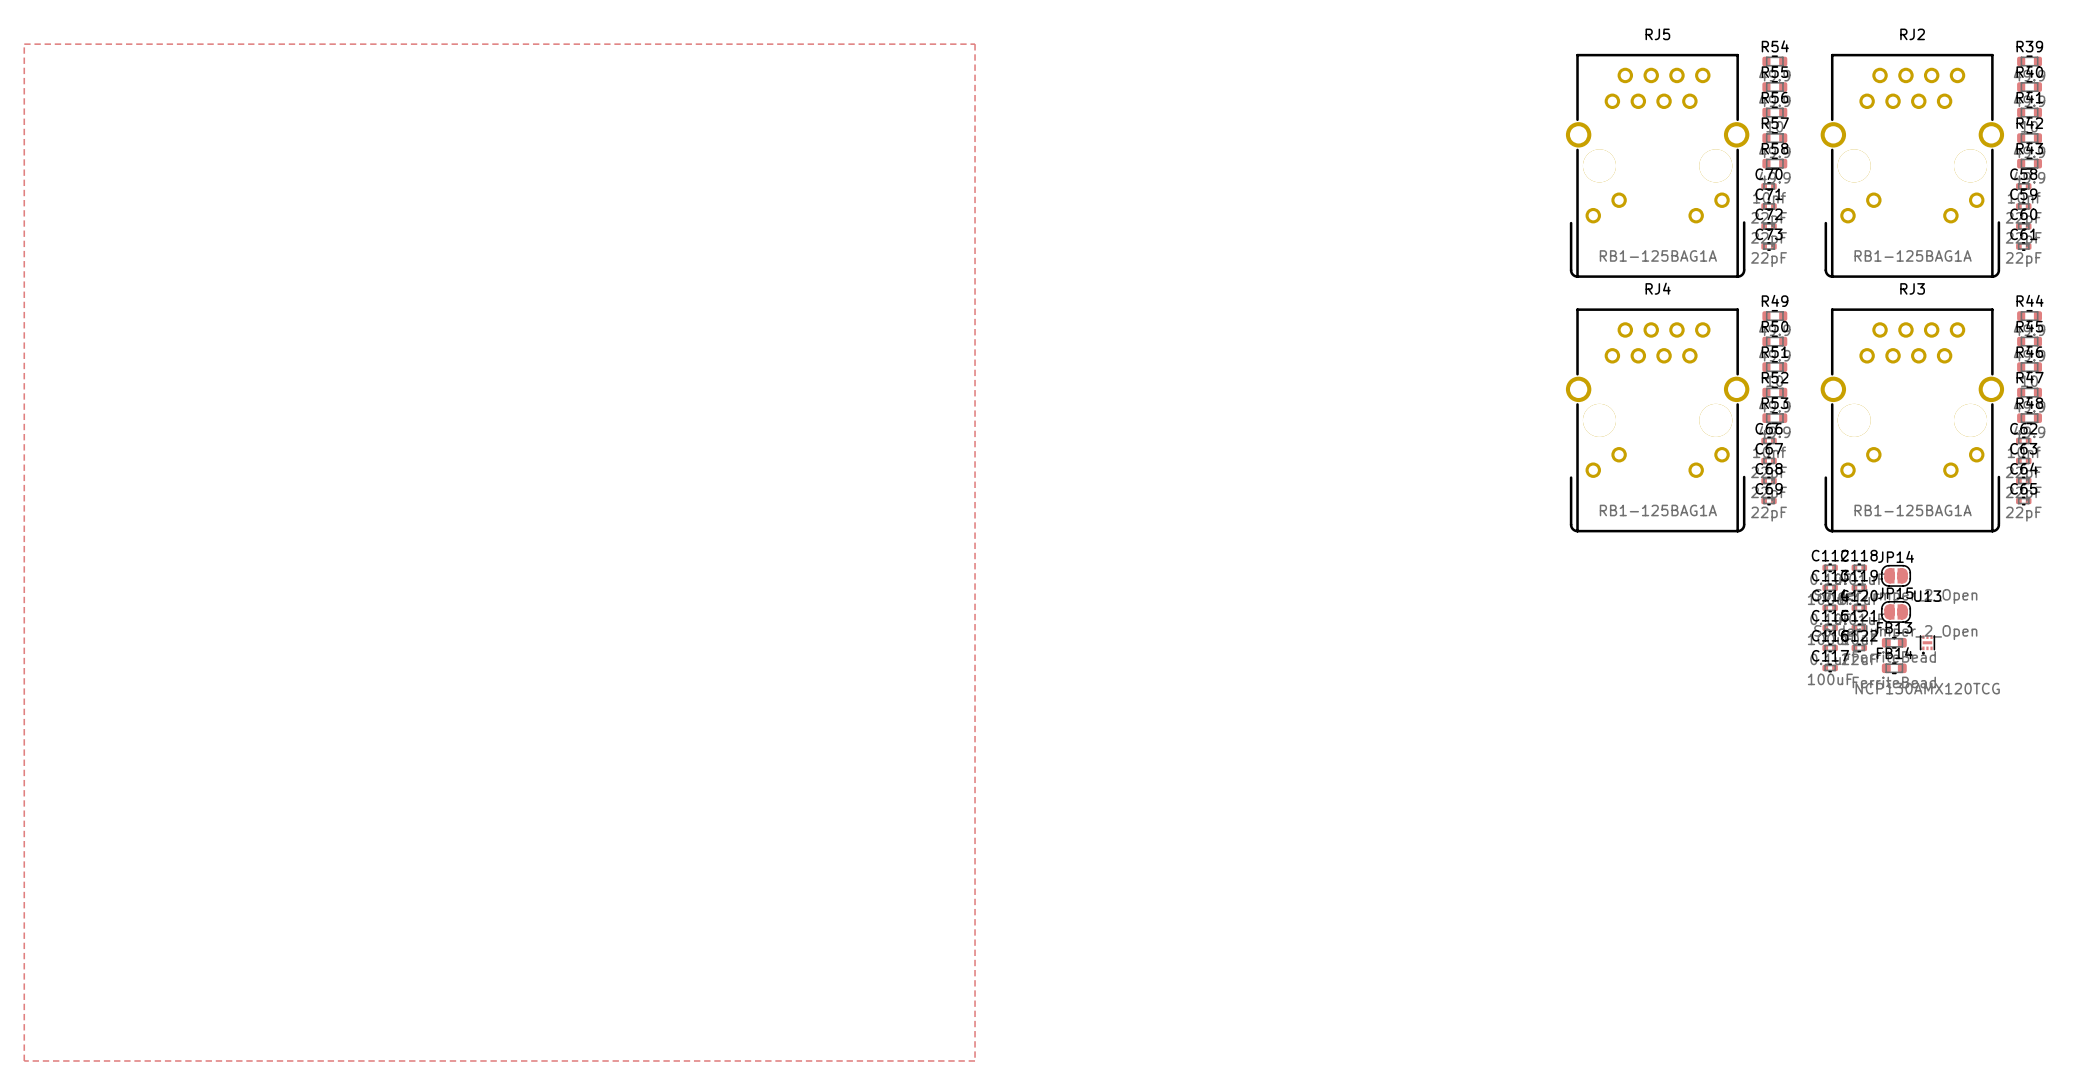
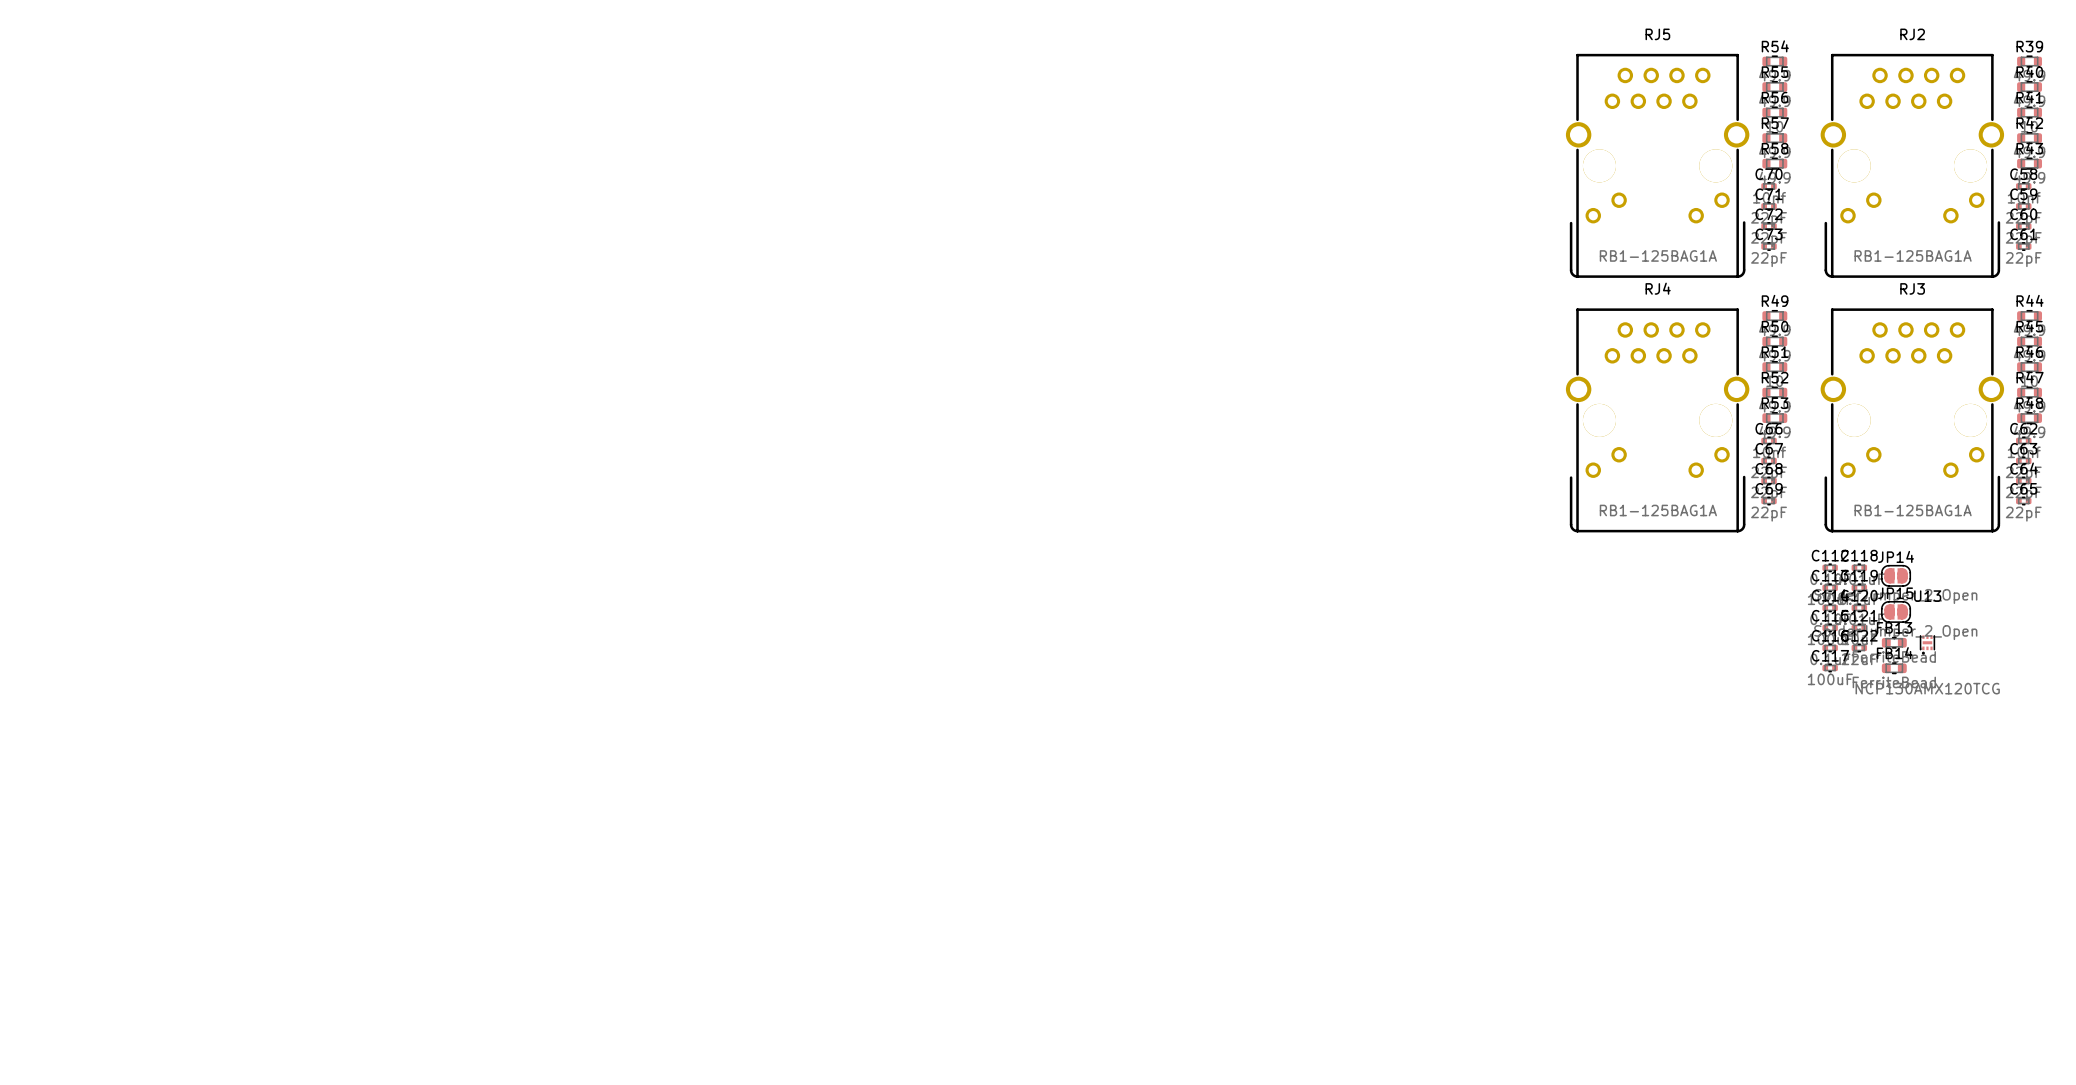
zone outline: (24, 44) (975, 44) (975, 1060) (24, 1060) (24, 44) -> none

